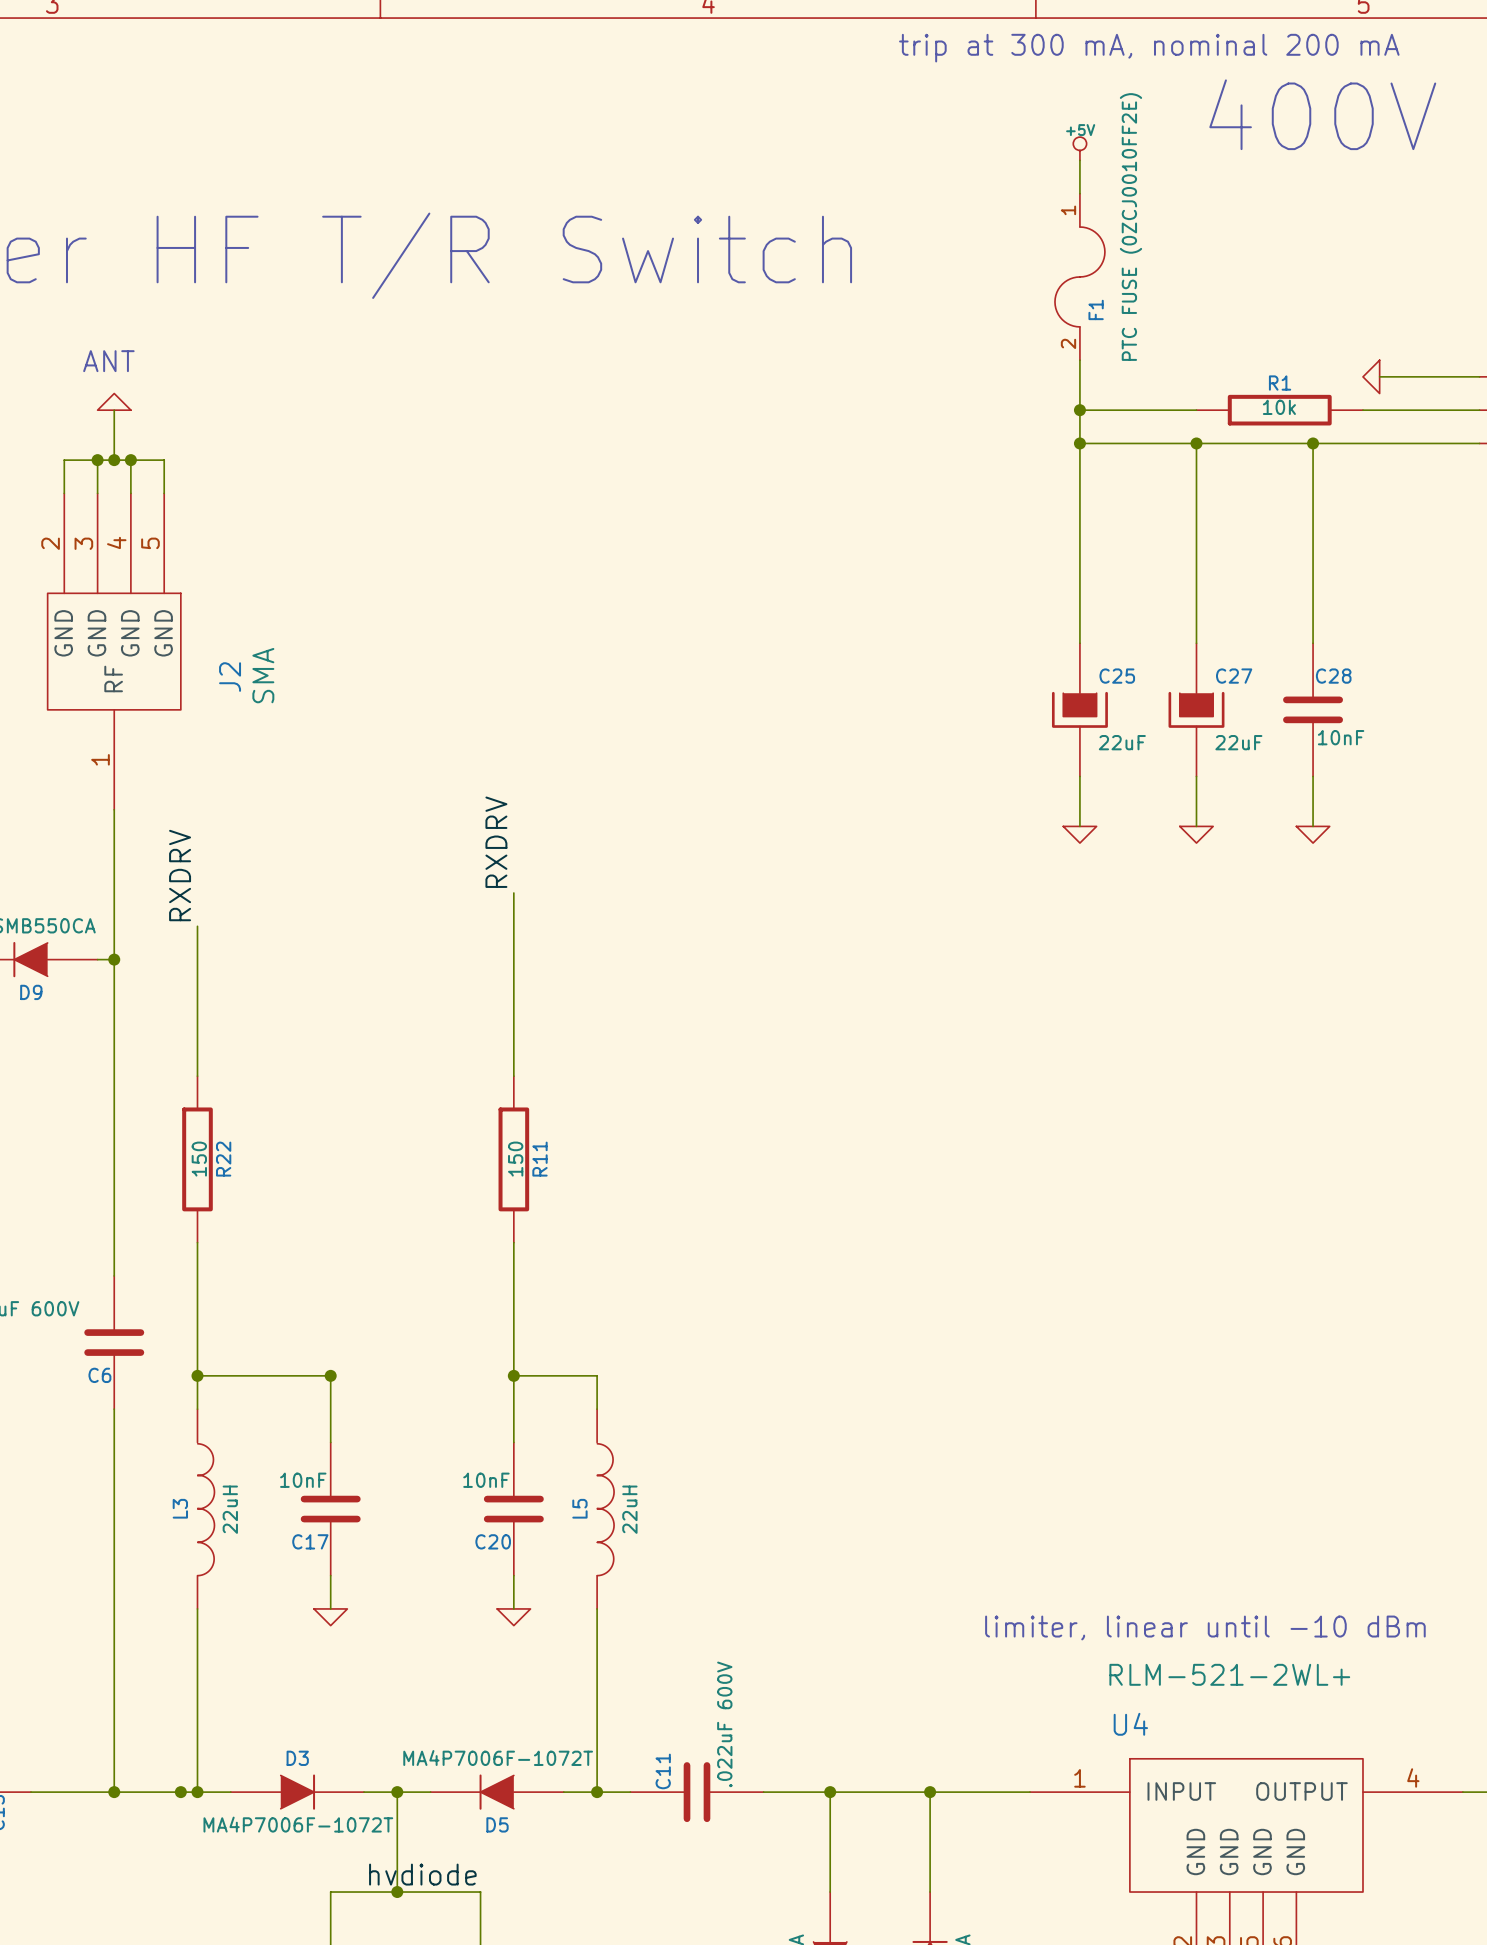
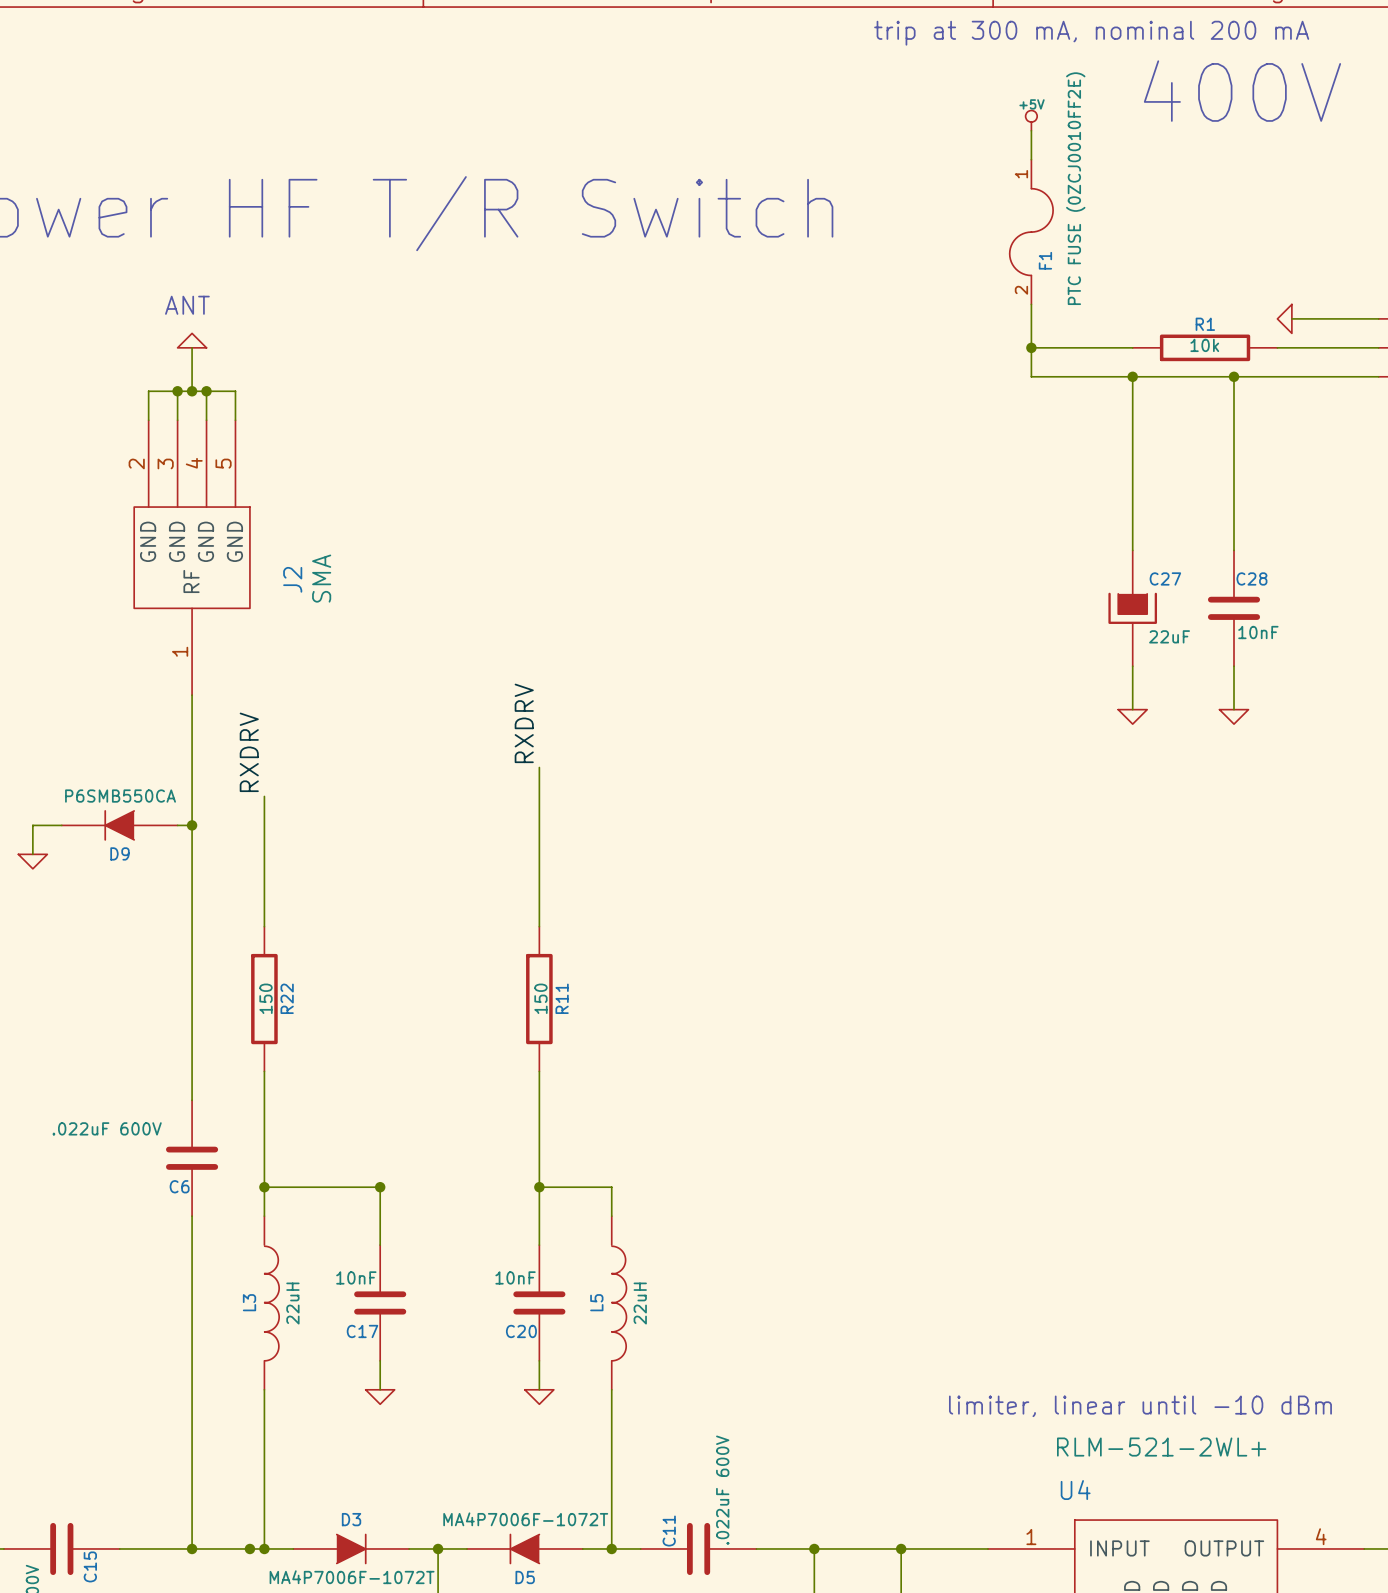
wire: (1079, 443) (1079, 643) -> none
junction: (1079, 443) -> none
C25: 22uF (1079, 709) -> none
wire: (1079, 776) (1079, 826) -> none
power symbol: (1079, 834) -> none

